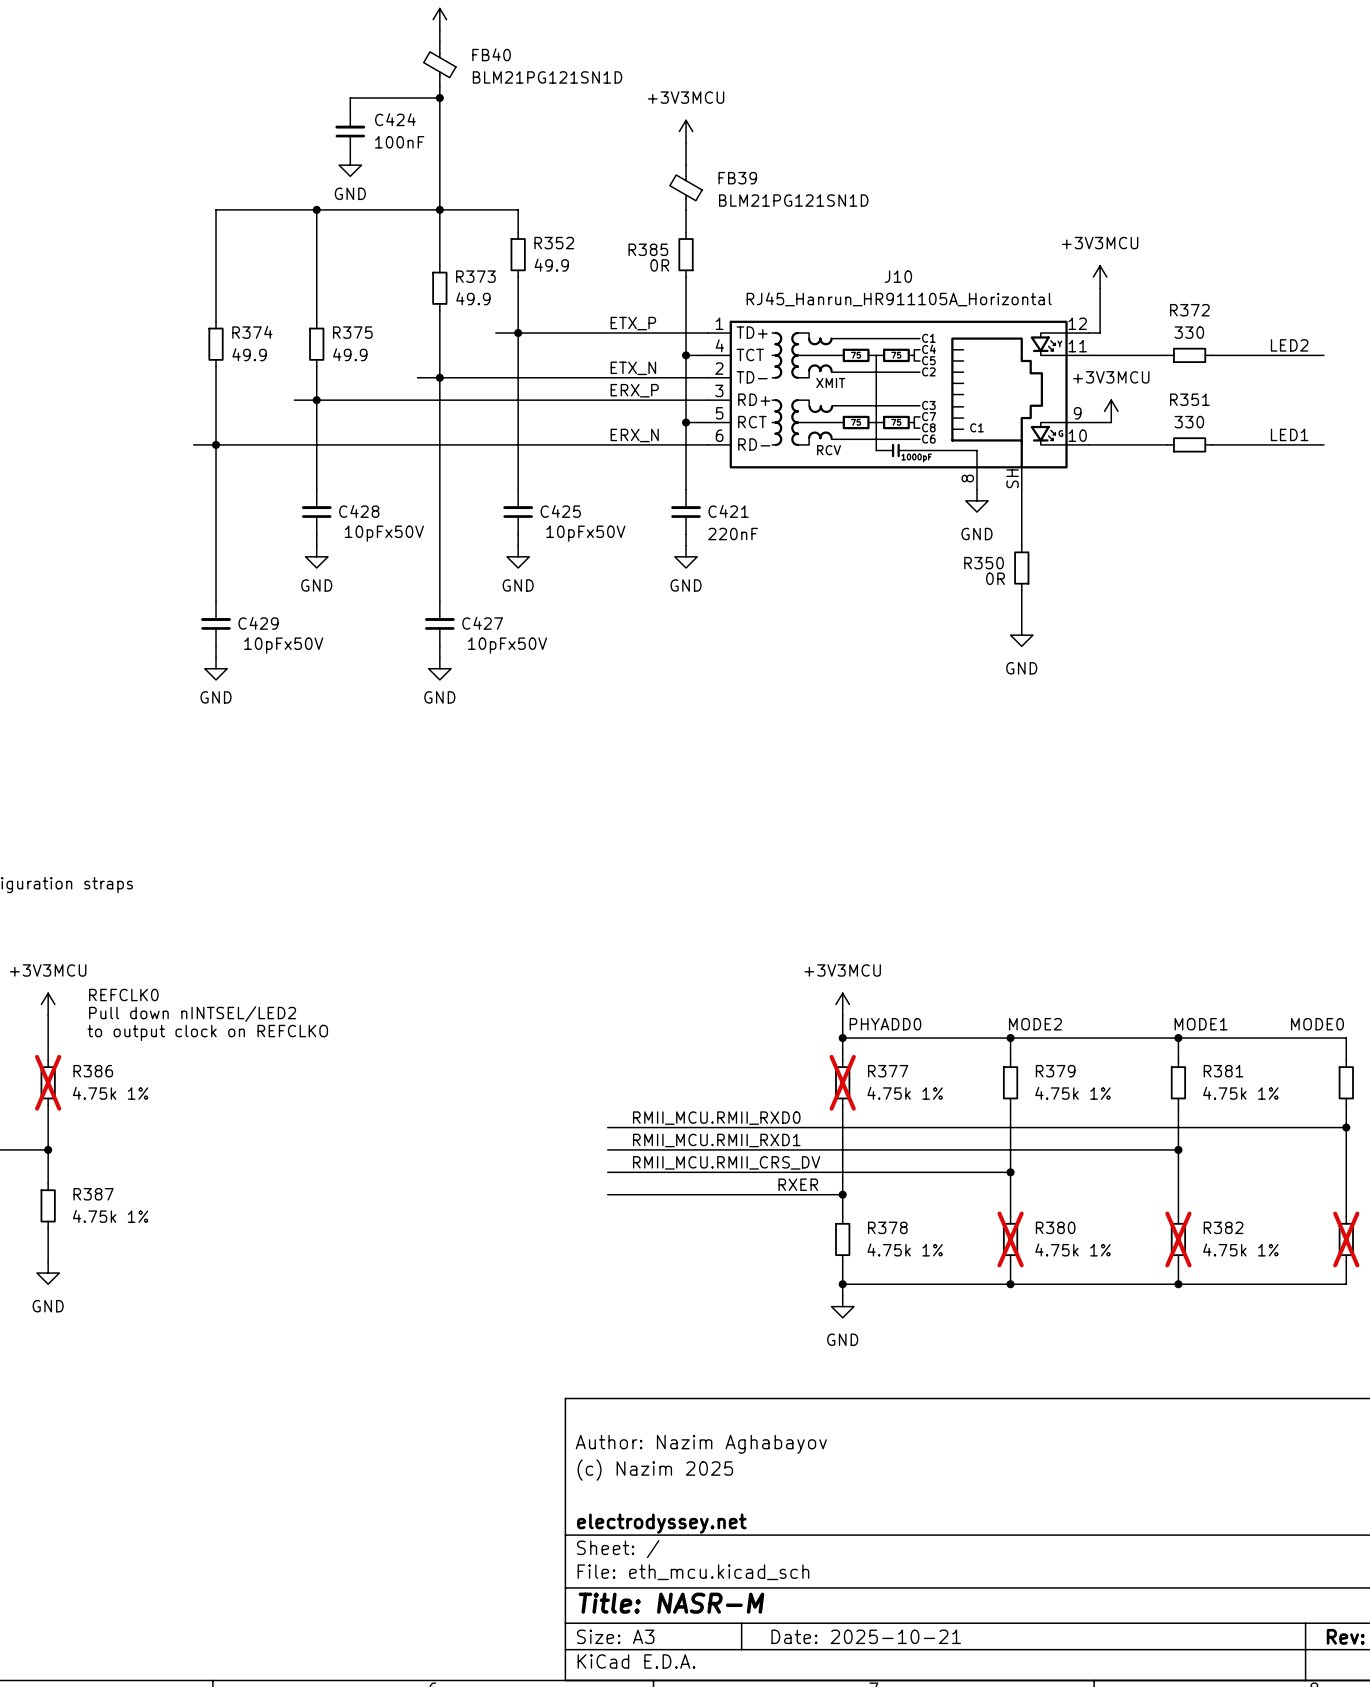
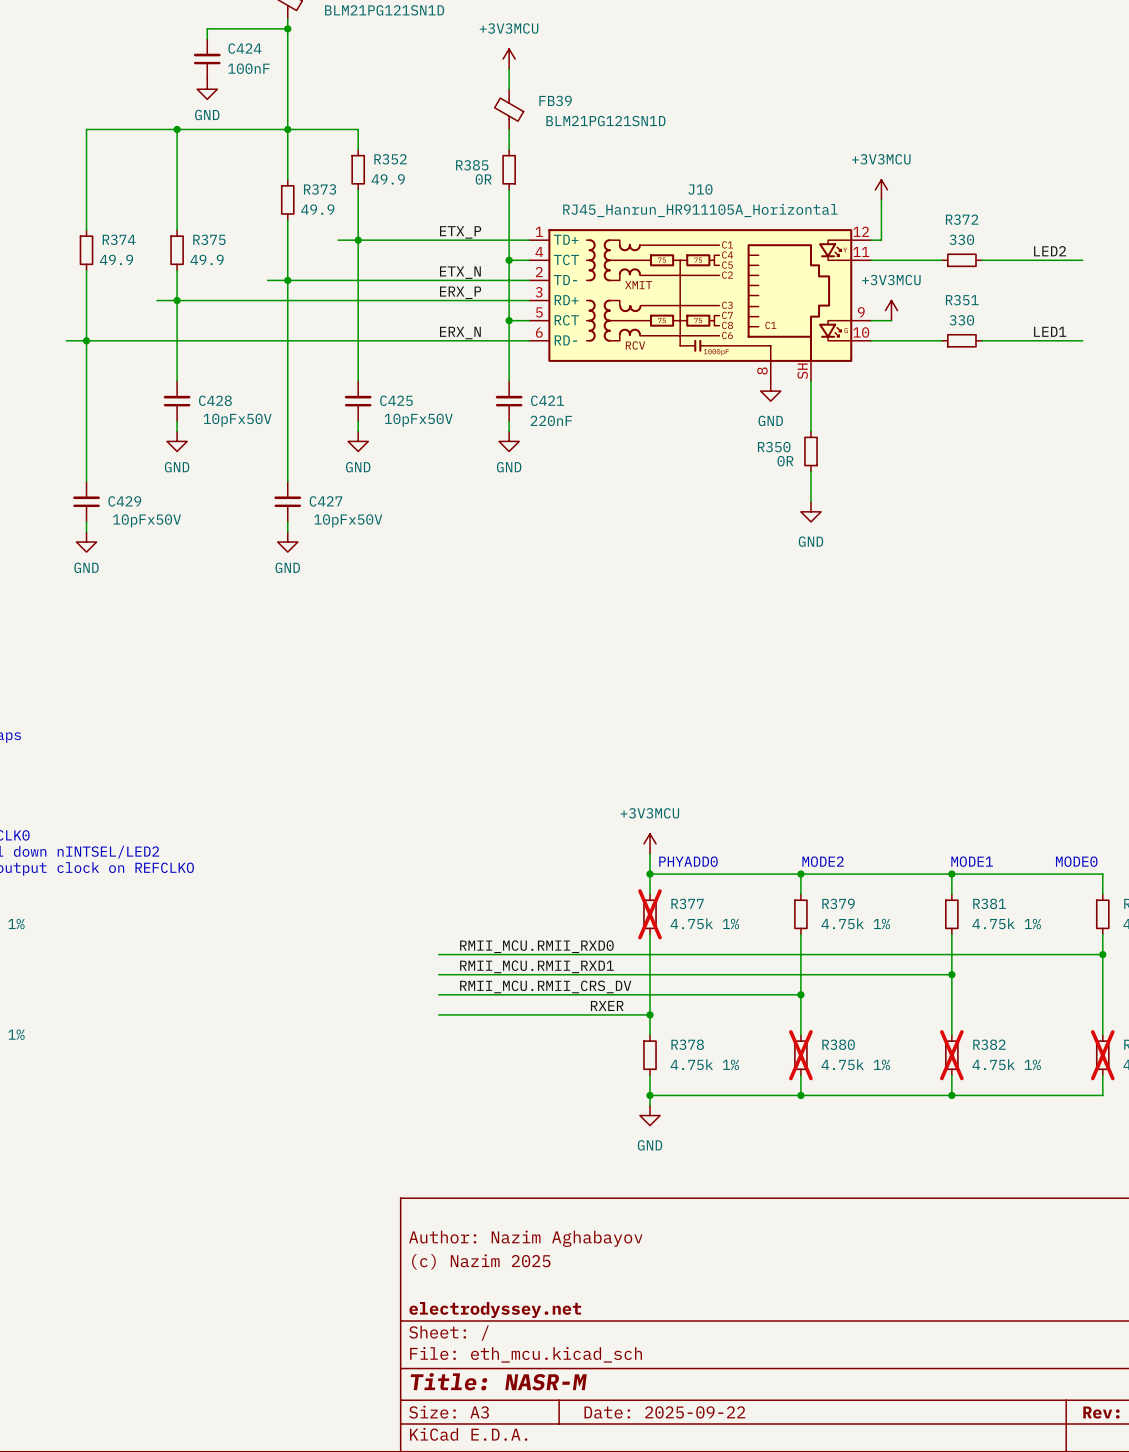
title block: Date: 2025-10-21 (866, 1636) -> Date: 2025-09-22 (664, 1412)

